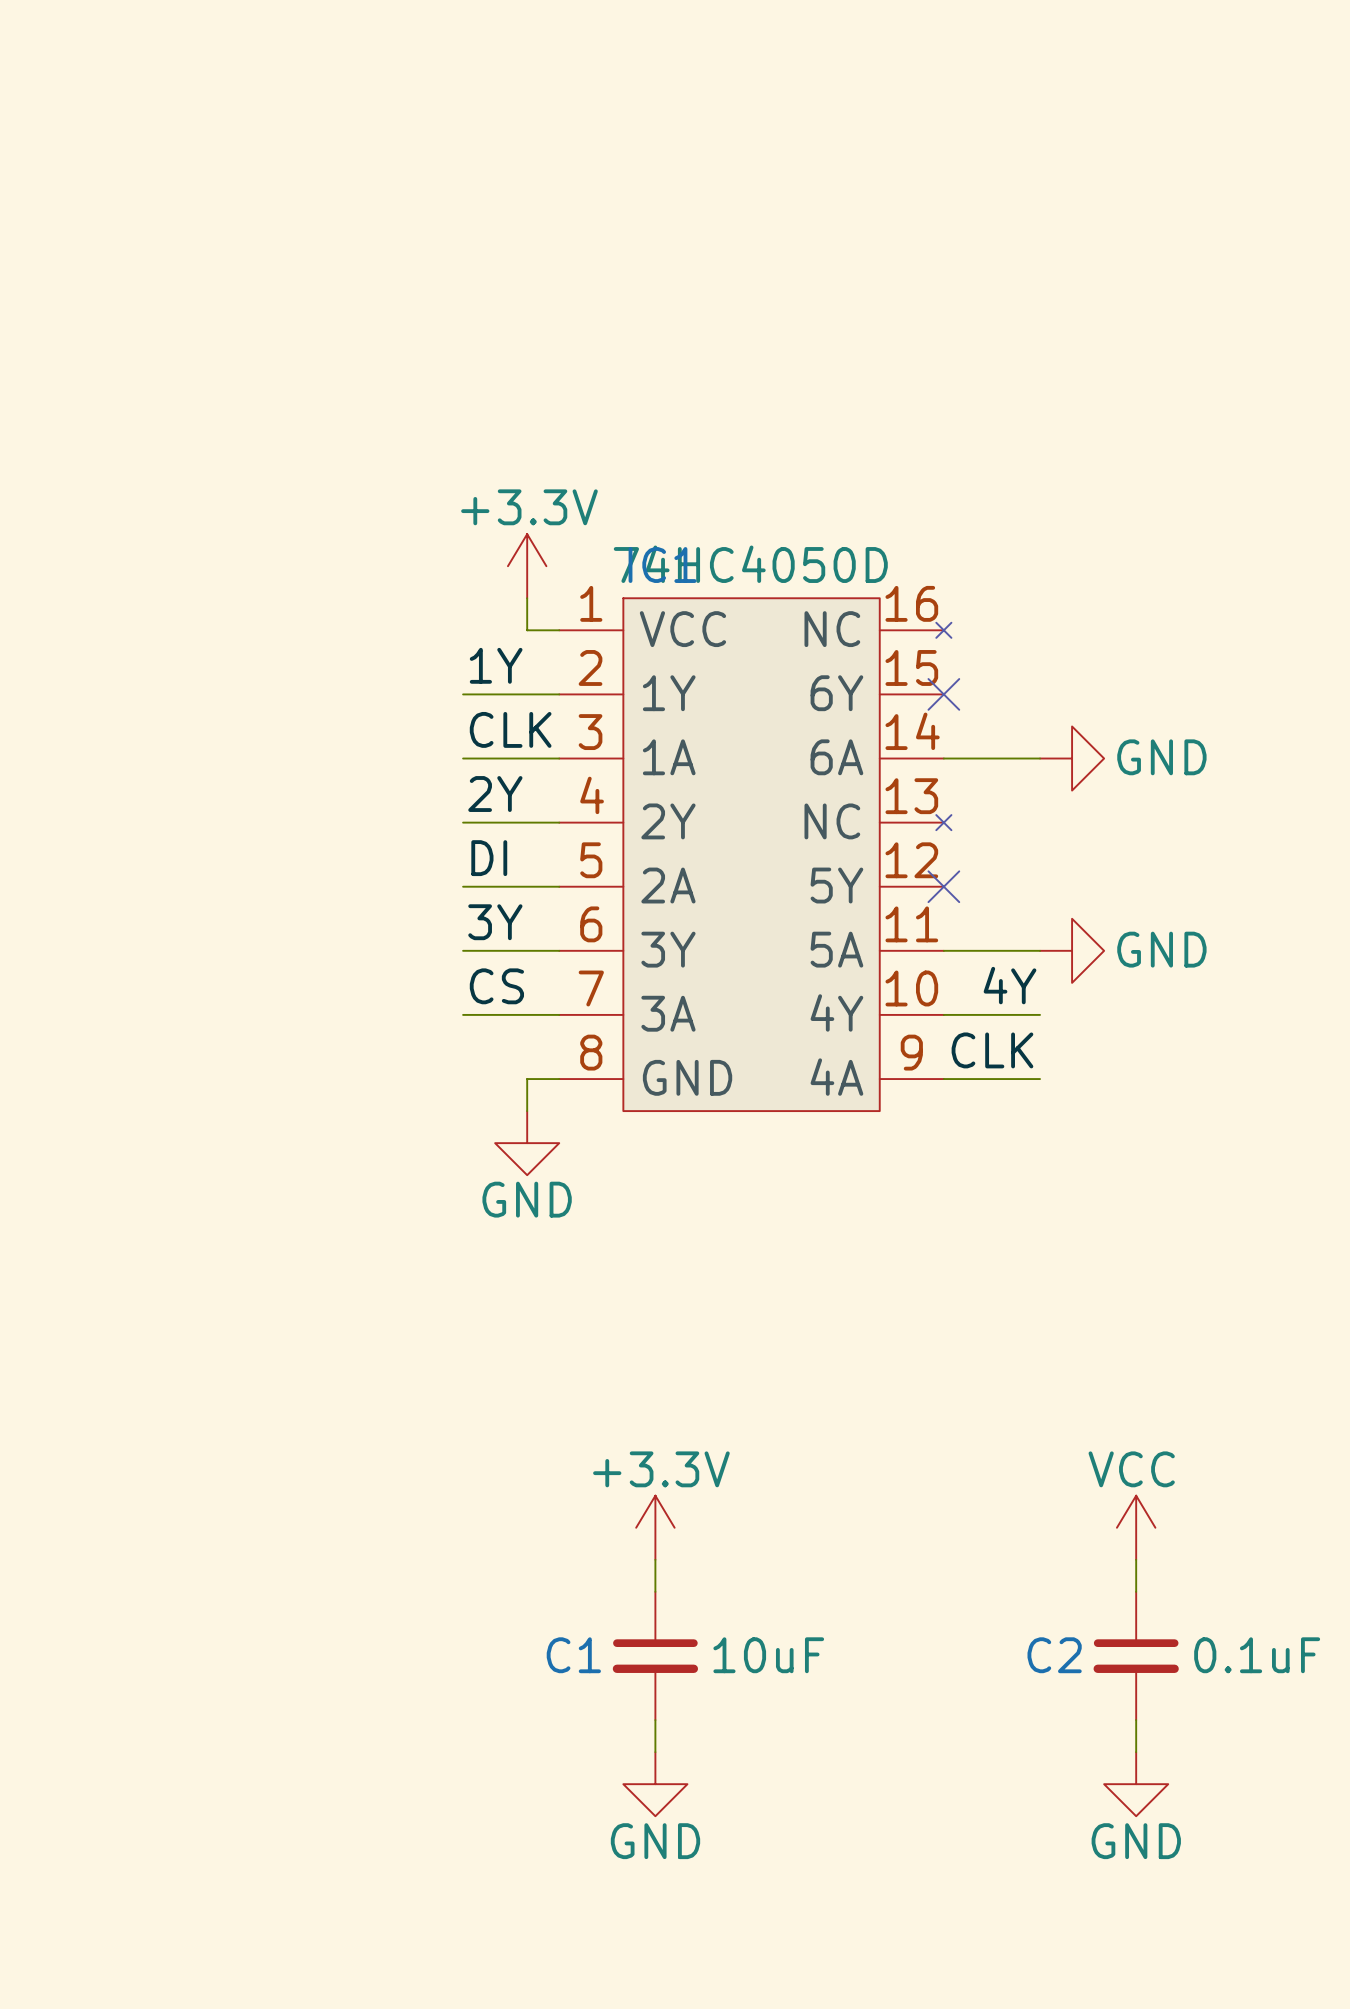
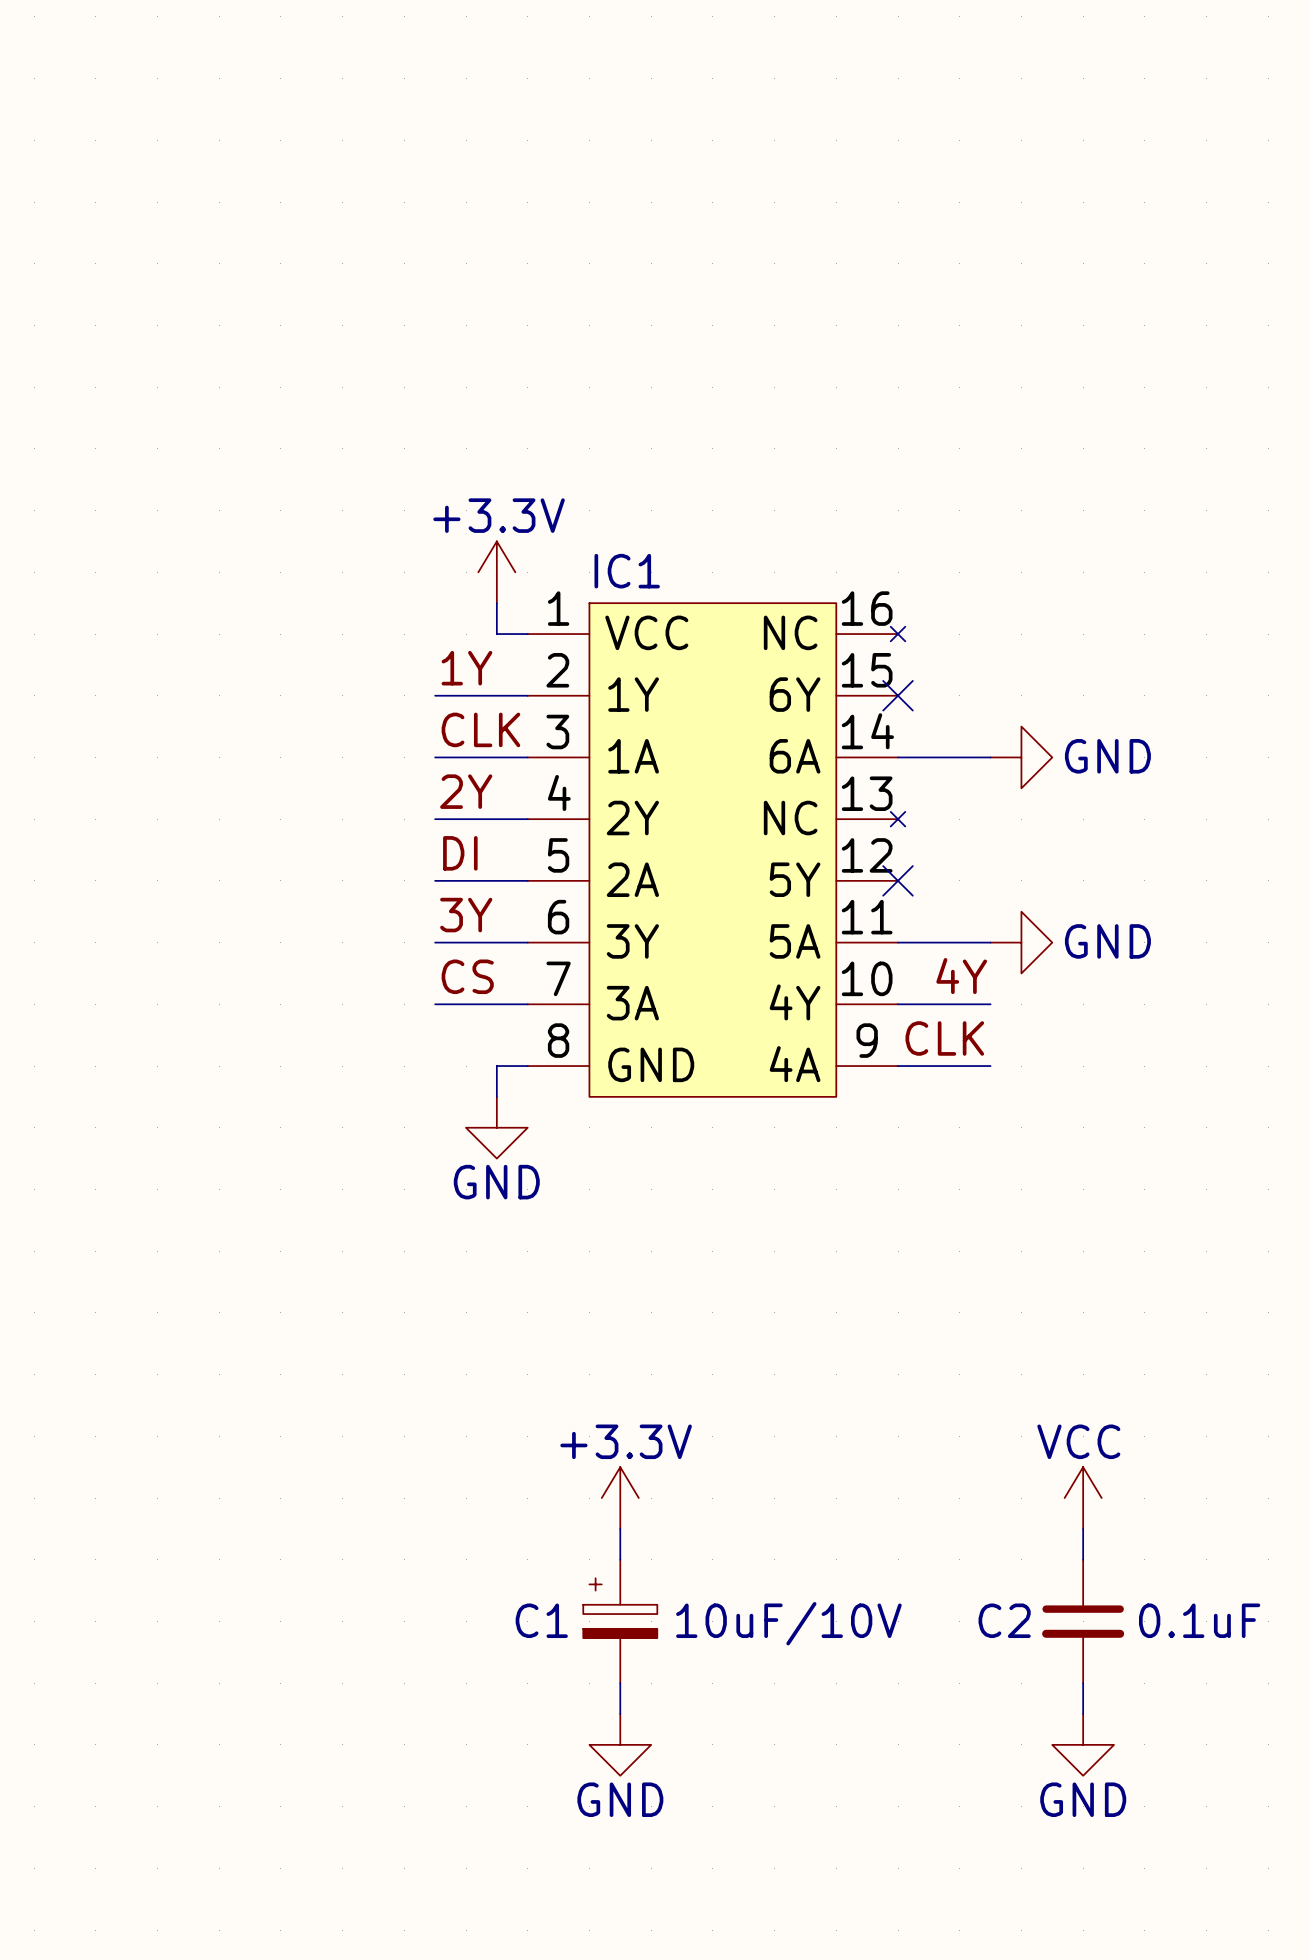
IC1 value: 74HC4050D (750, 564) -> none
C1 symbol: [612, 1591, 699, 1721] -> [583, 1559, 658, 1684]
C1 value: 10uF (768, 1655) -> 10uF/10V (788, 1623)

